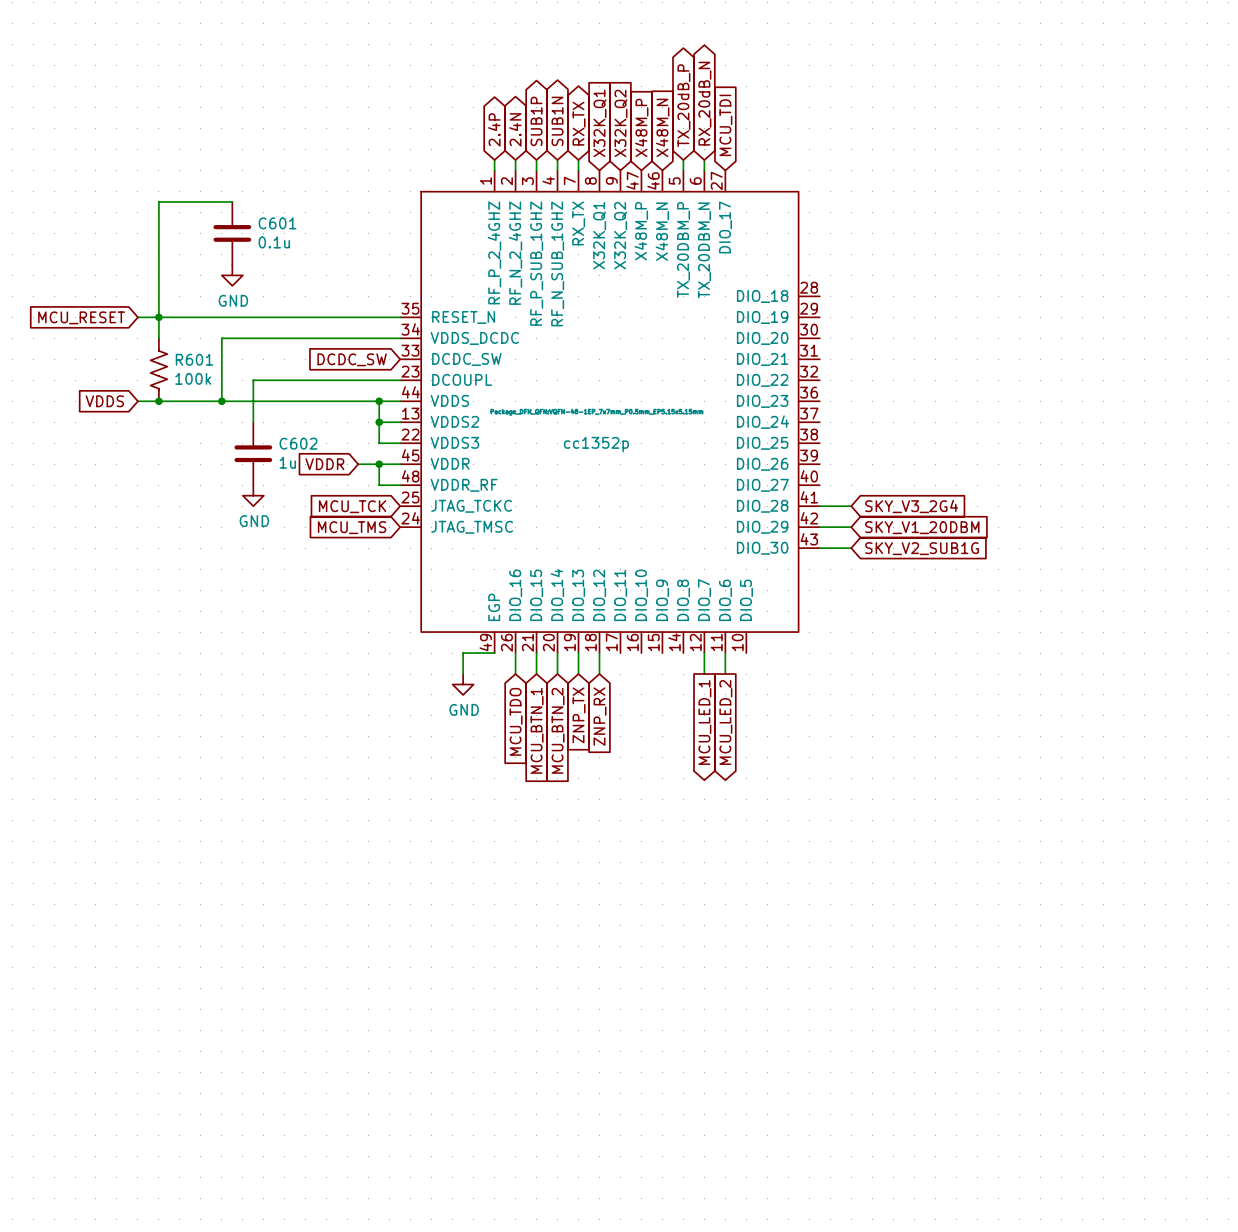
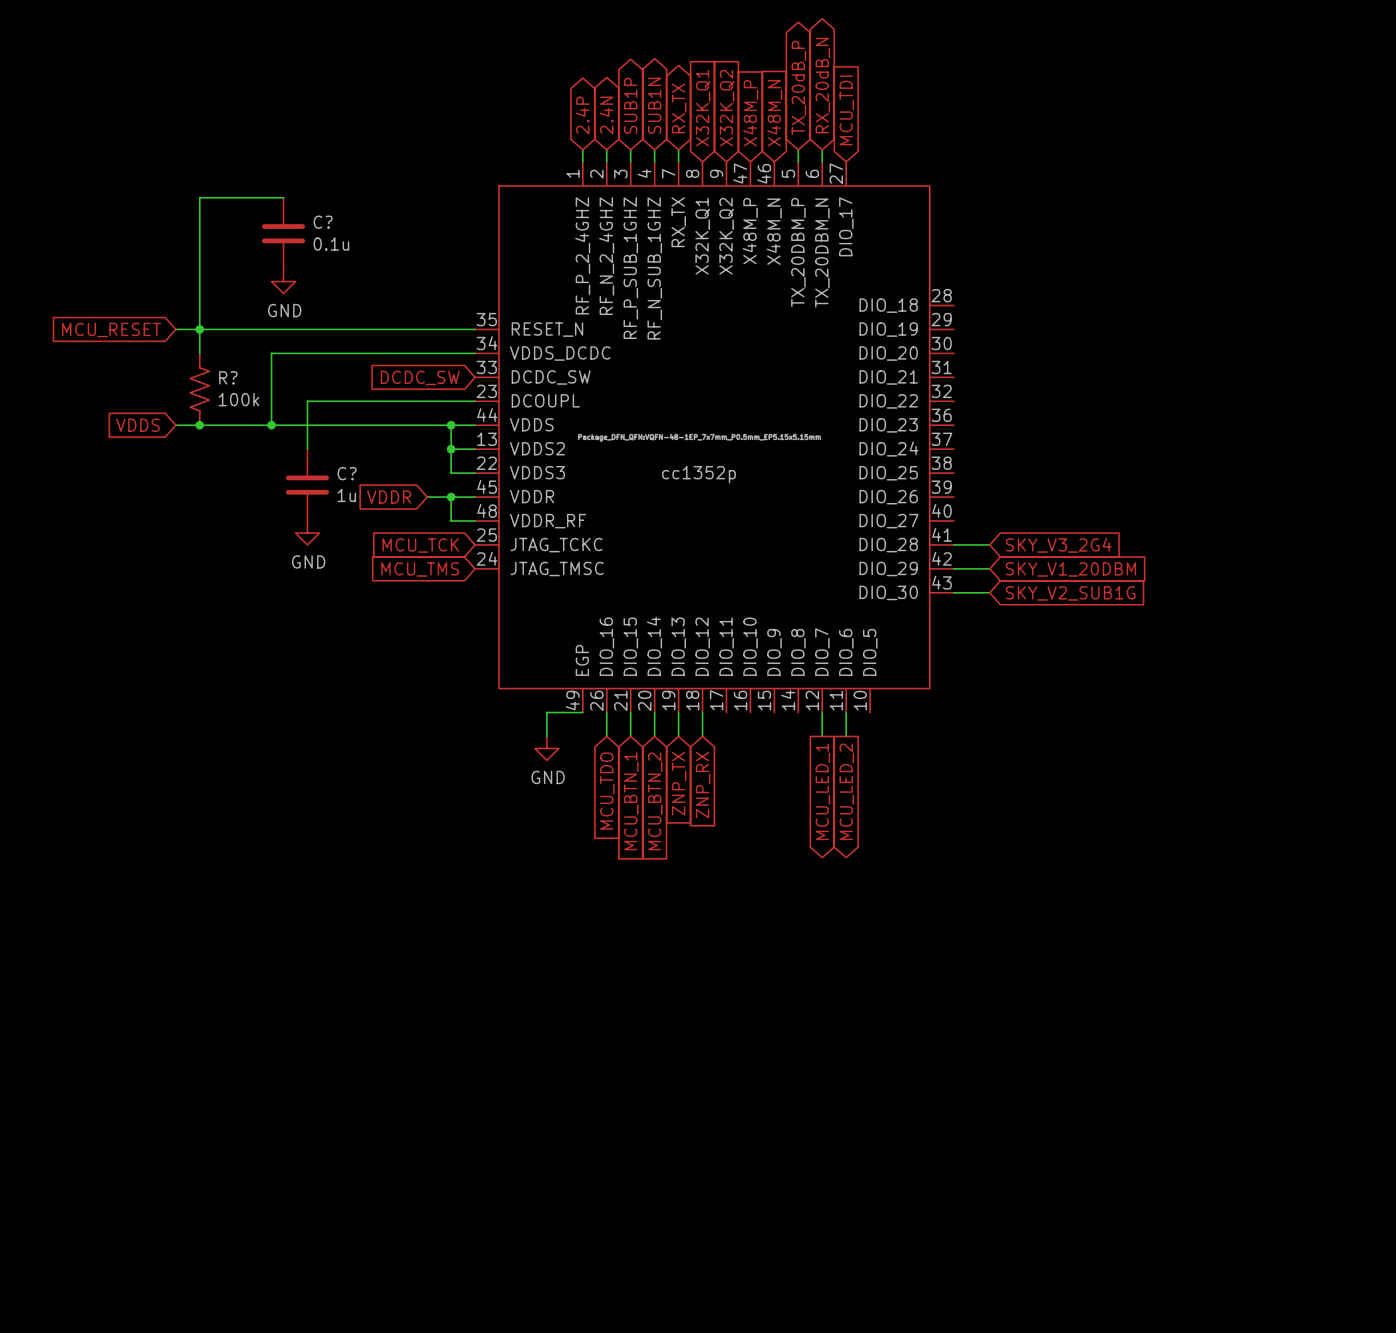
C601 name: C601 (277, 223) -> C? (323, 222)
R601 name: R601 (194, 359) -> R? (228, 377)
C602 name: C602 (298, 443) -> C? (347, 473)

